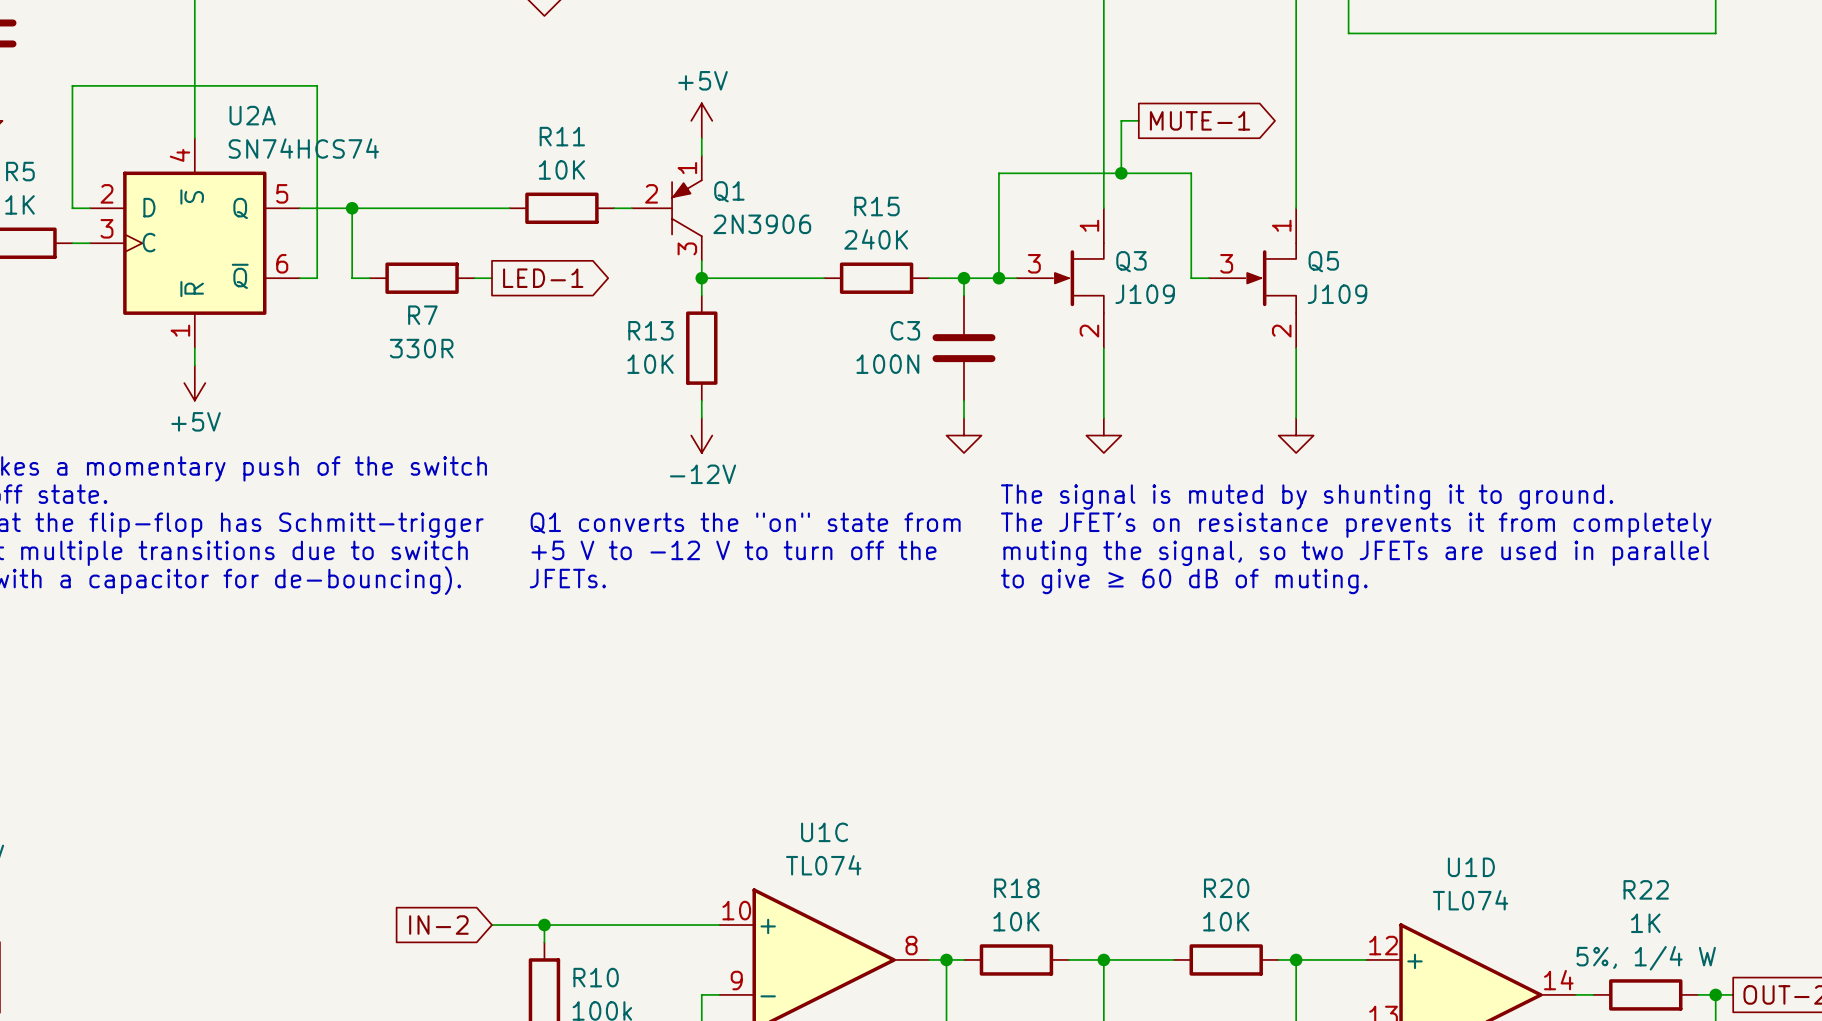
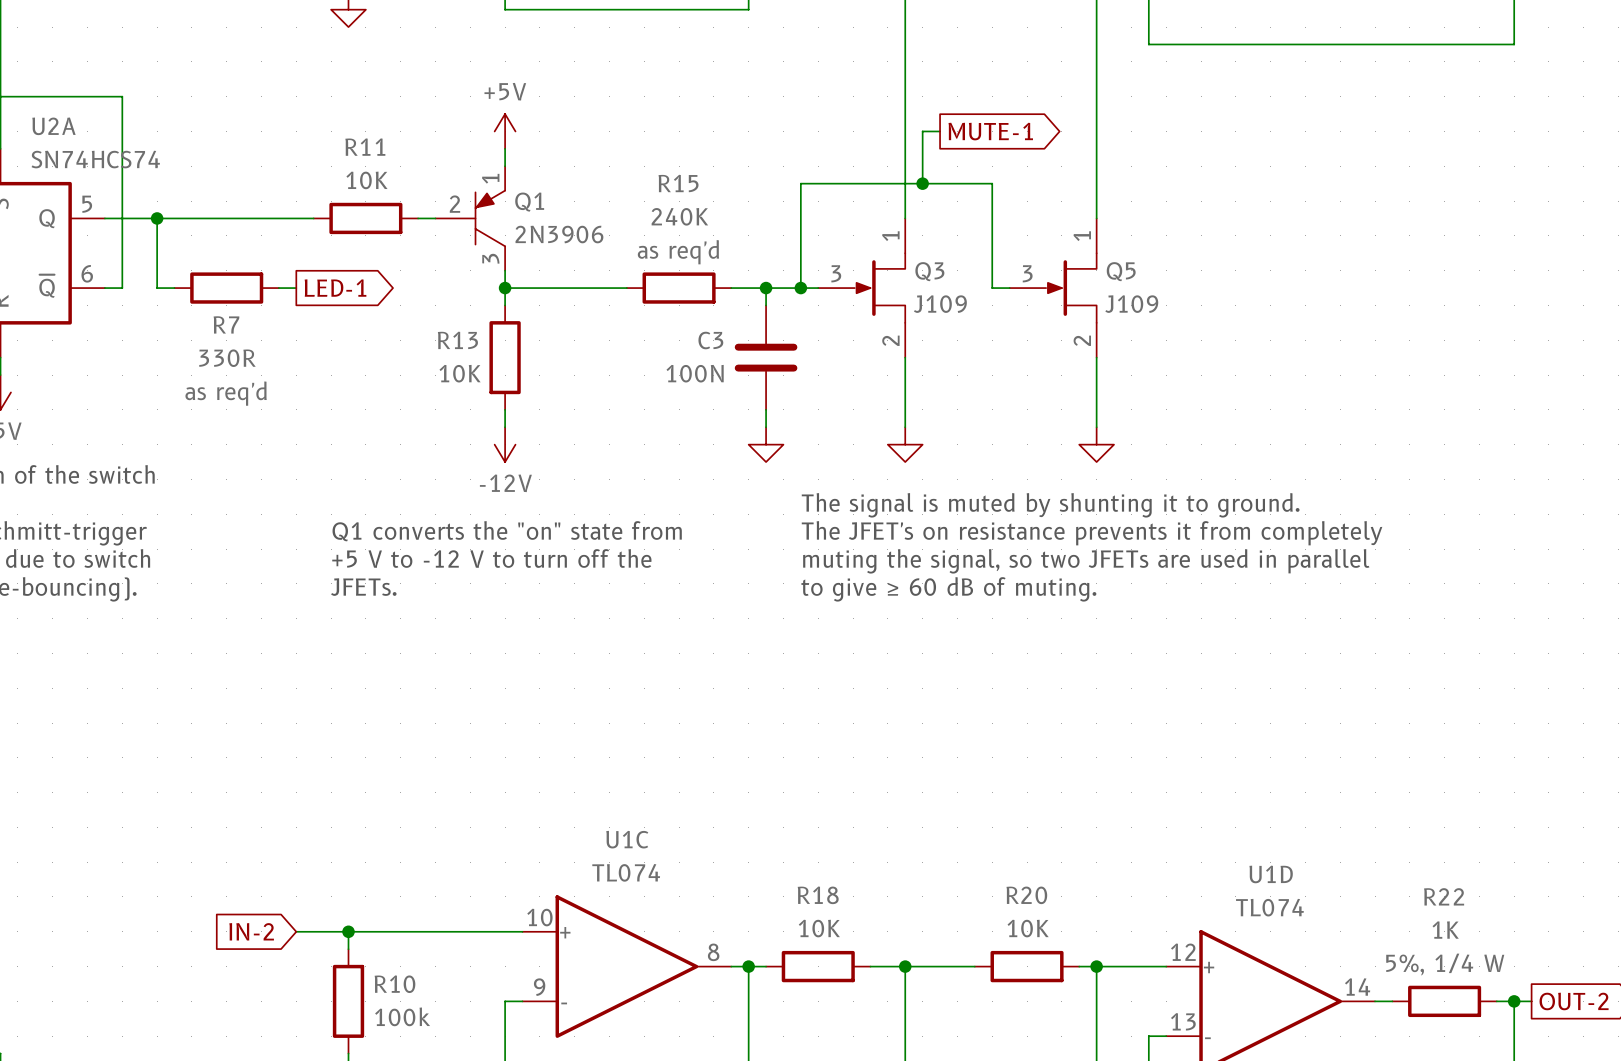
R15 name position: R15 (877, 206) -> R15 (678, 183)
R15 value position: 240K (876, 239) -> 240K (679, 216)
R15 text: none -> as req'd (678, 252)
R7 text: none -> as req'd (226, 393)

